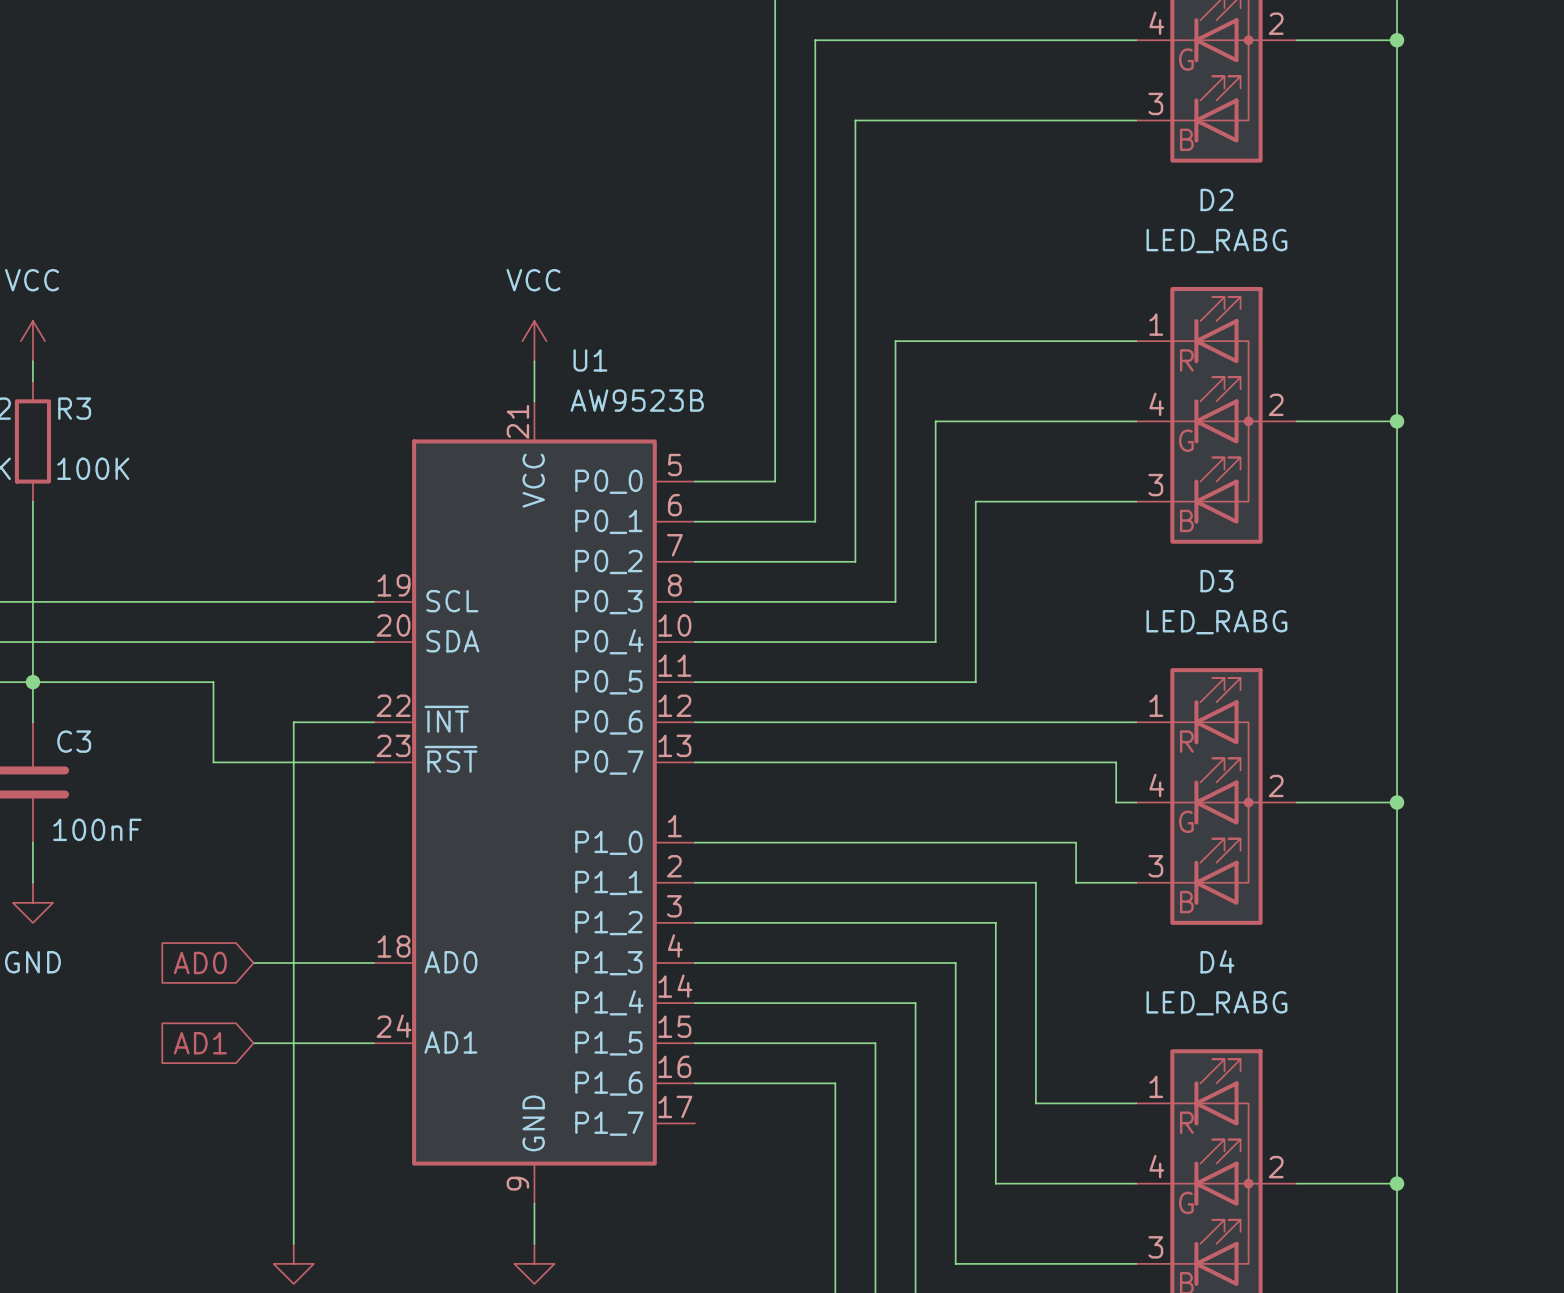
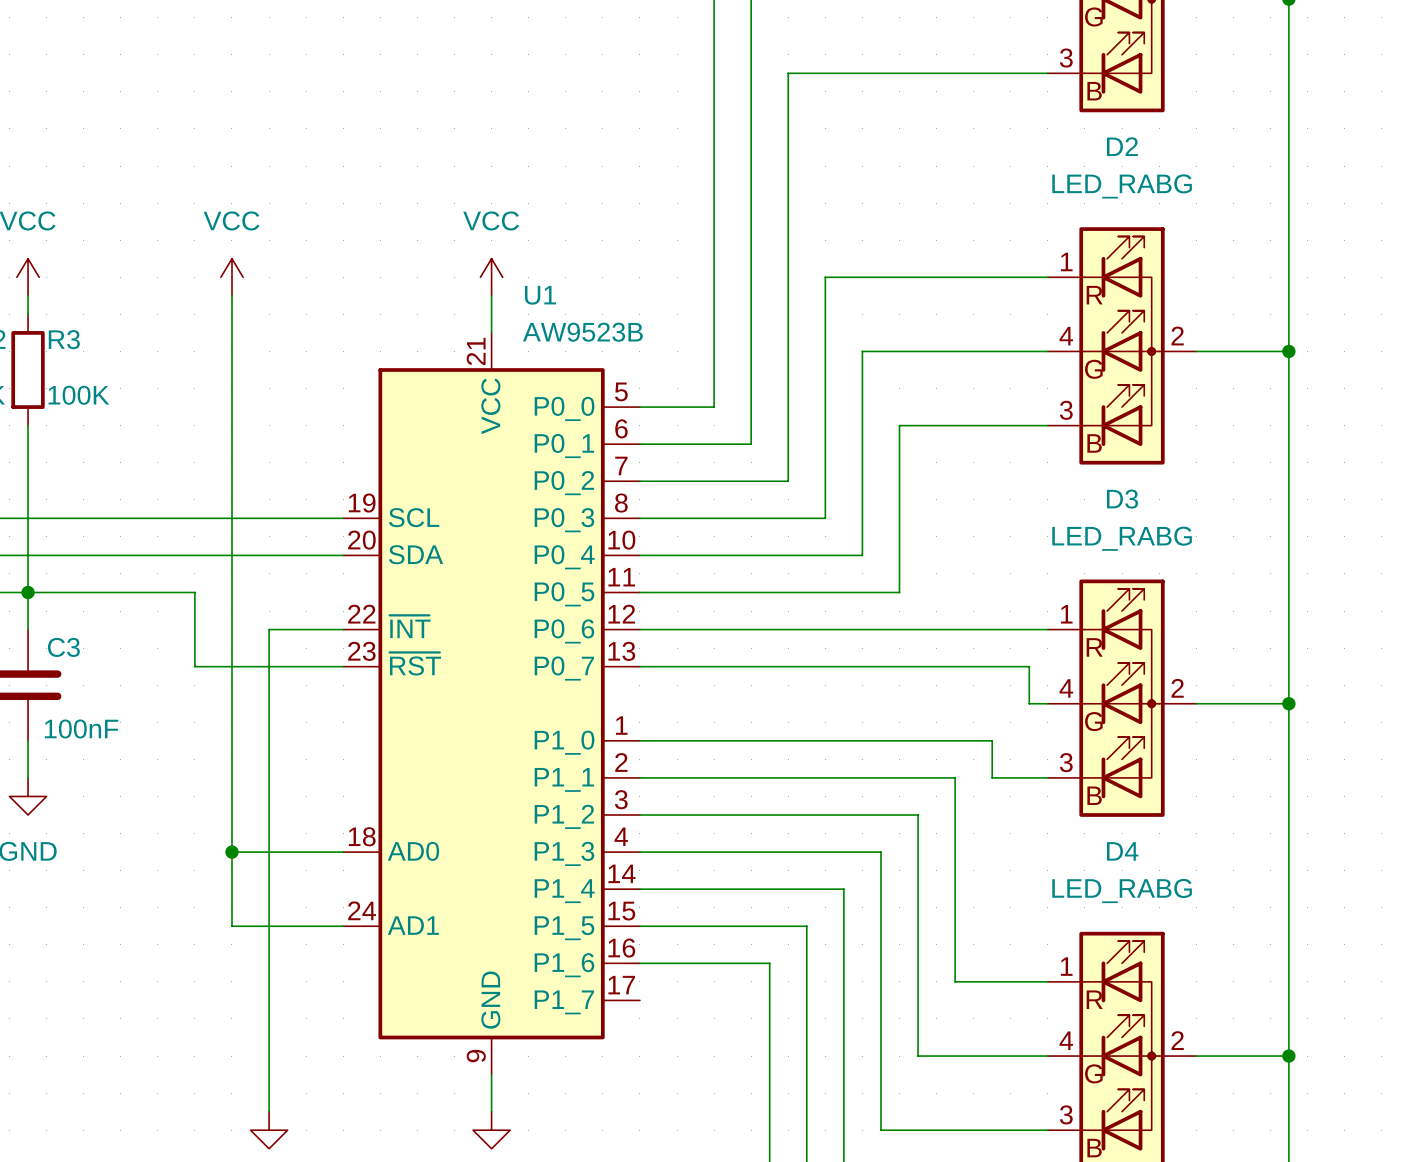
power symbol: none -> VCC (231, 277)
wire: none -> (231, 295) (231, 926)
global label: AD0 (200, 962) -> none
junction: none -> (231, 852)
global label: AD1 (200, 1043) -> none

